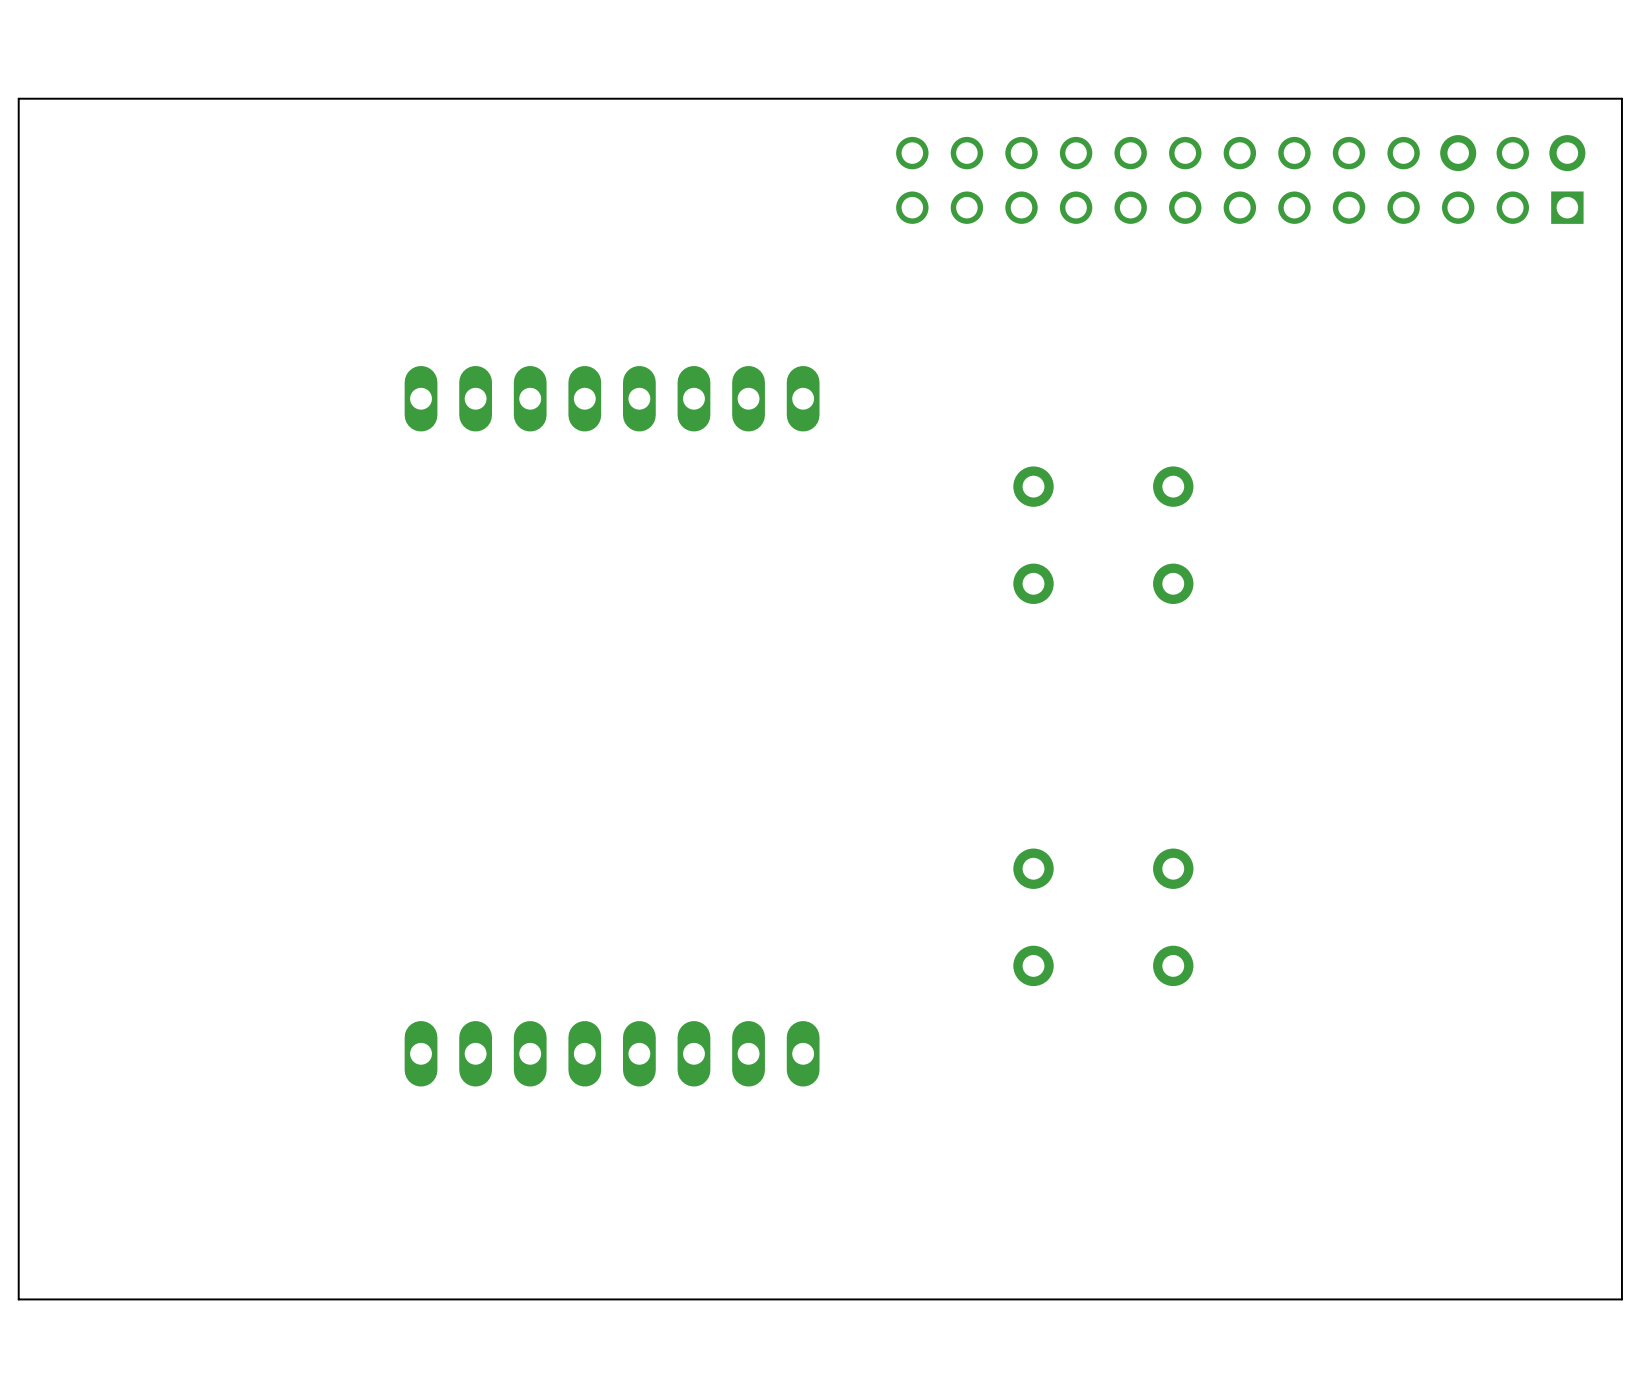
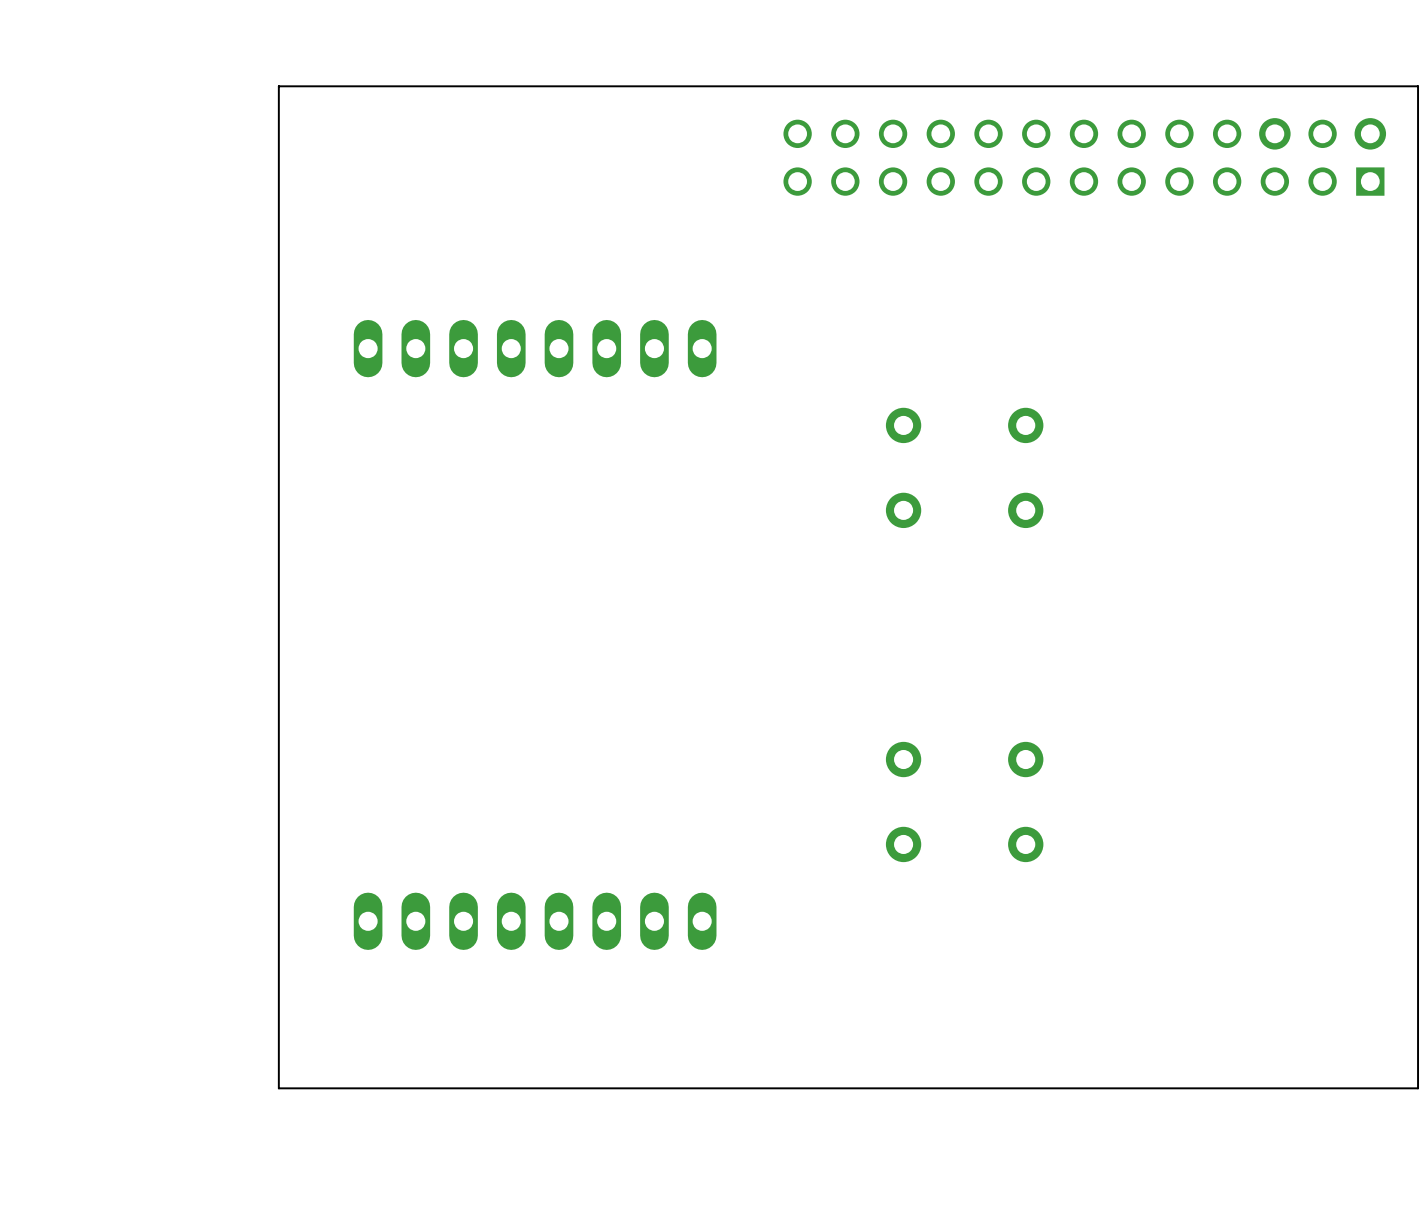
board edge: (318, 98) (18, 98) (18, 1299) (1621, 1299) (1621, 1244) -> (278, 86) (278, 1088) (1418, 1088)

